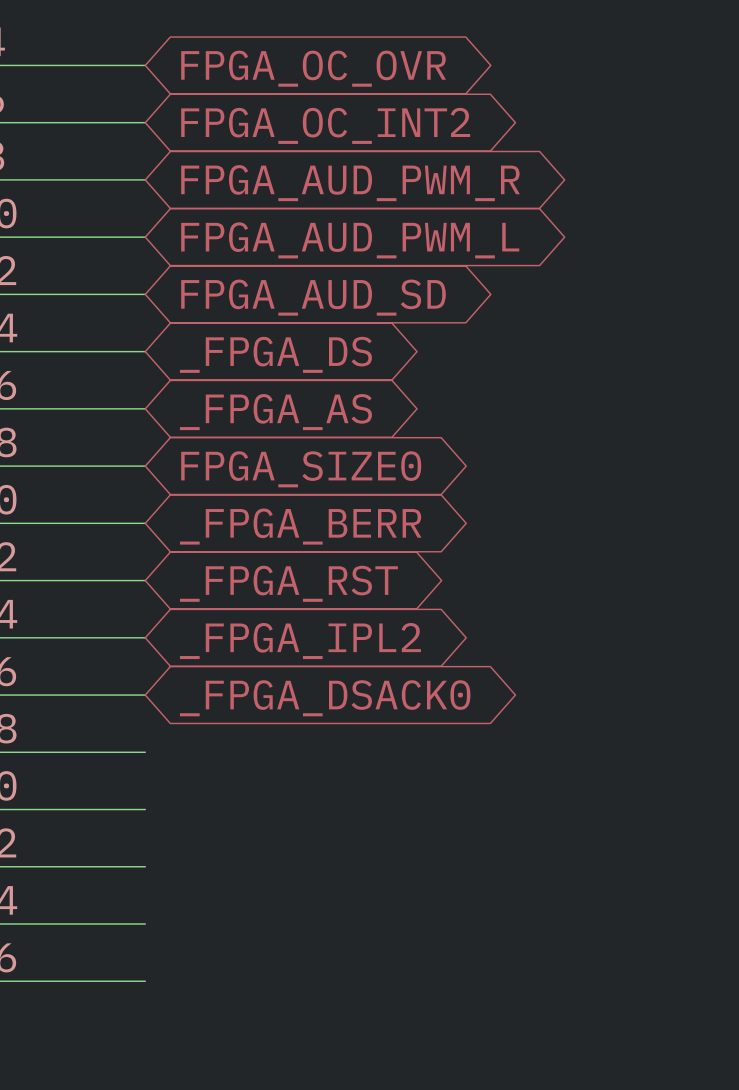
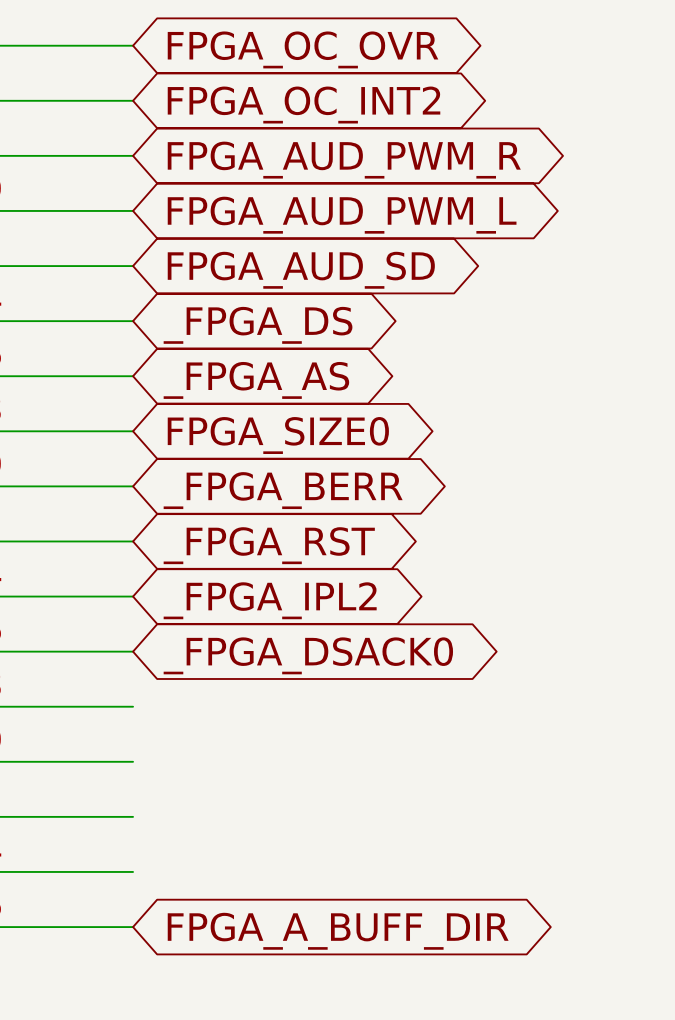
global label: none -> FPGA_A_BUFF_DIR (338, 931)

